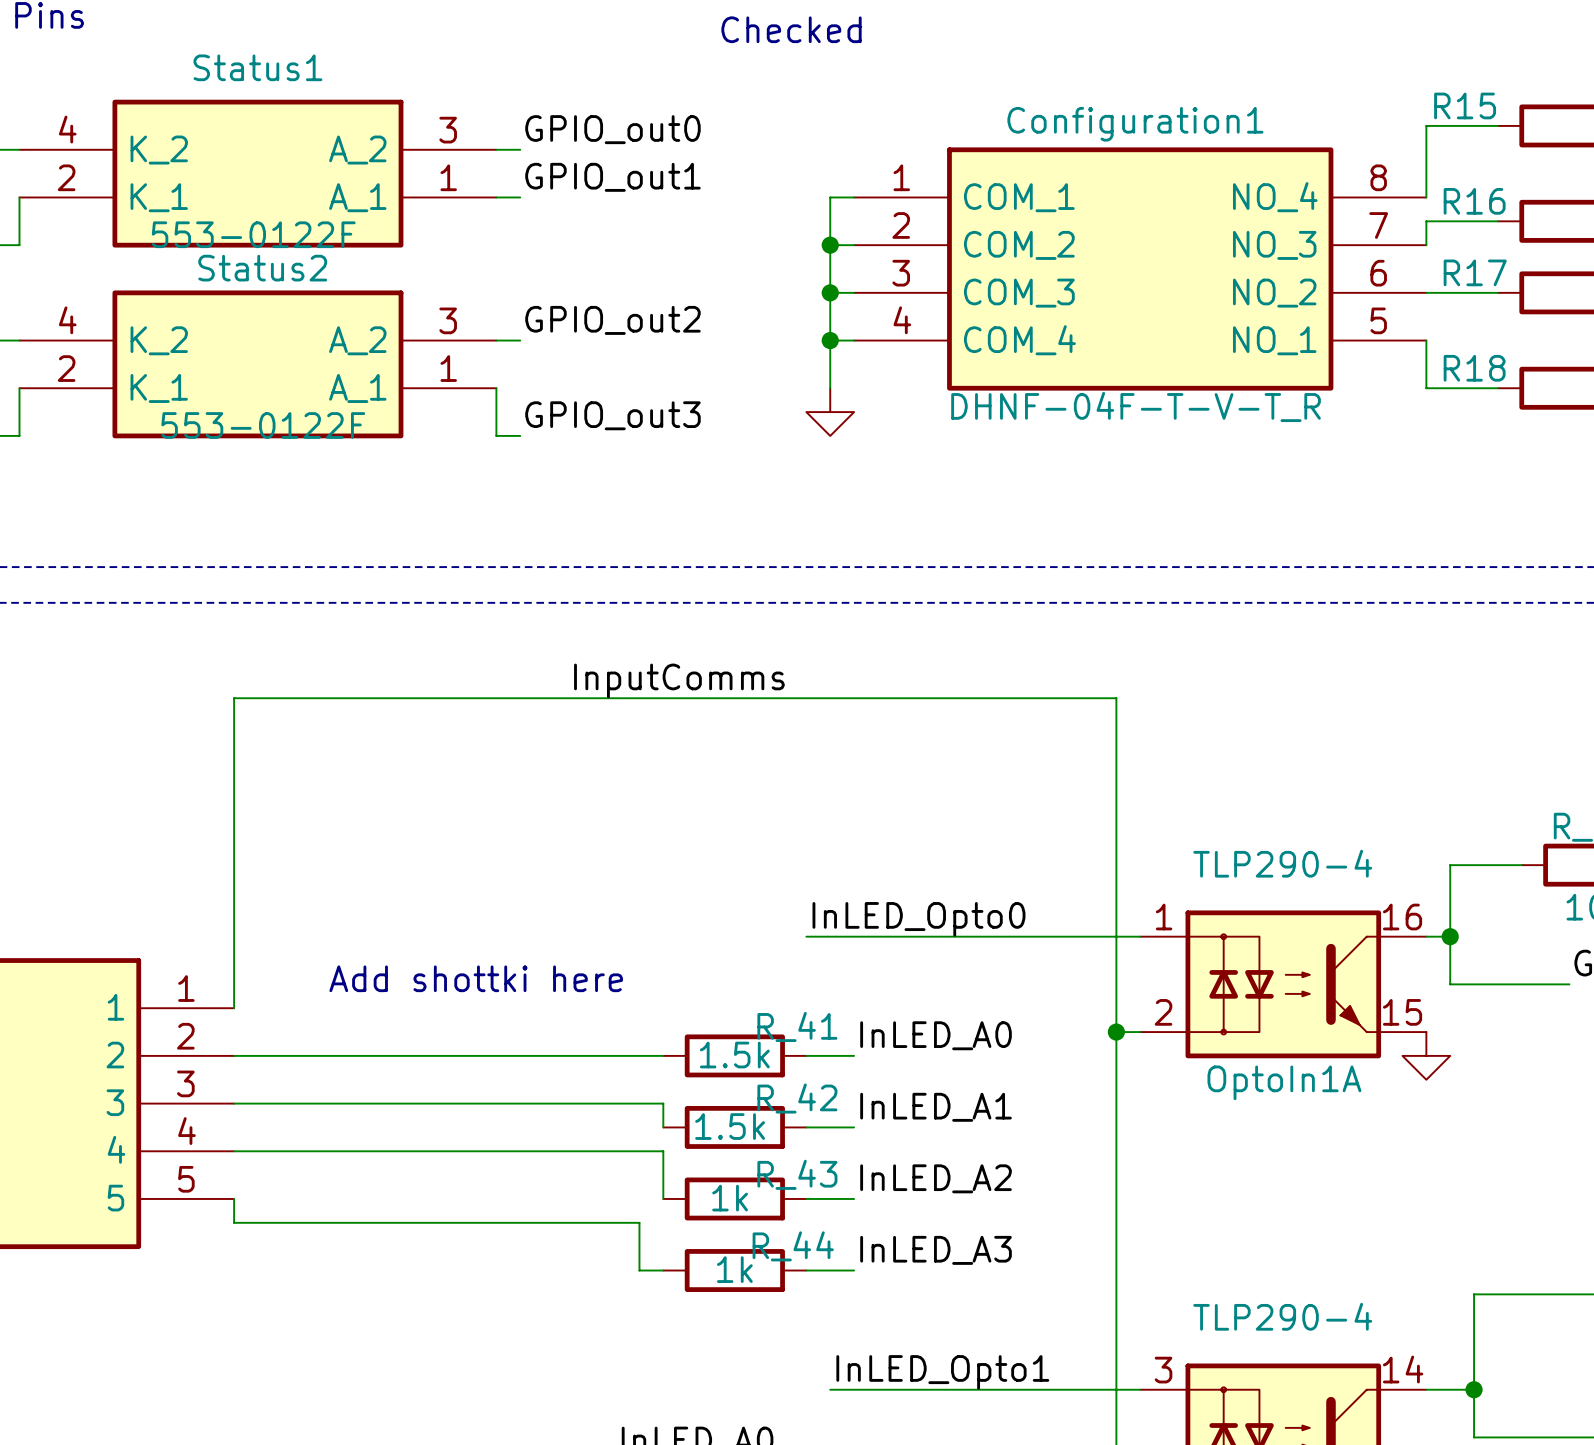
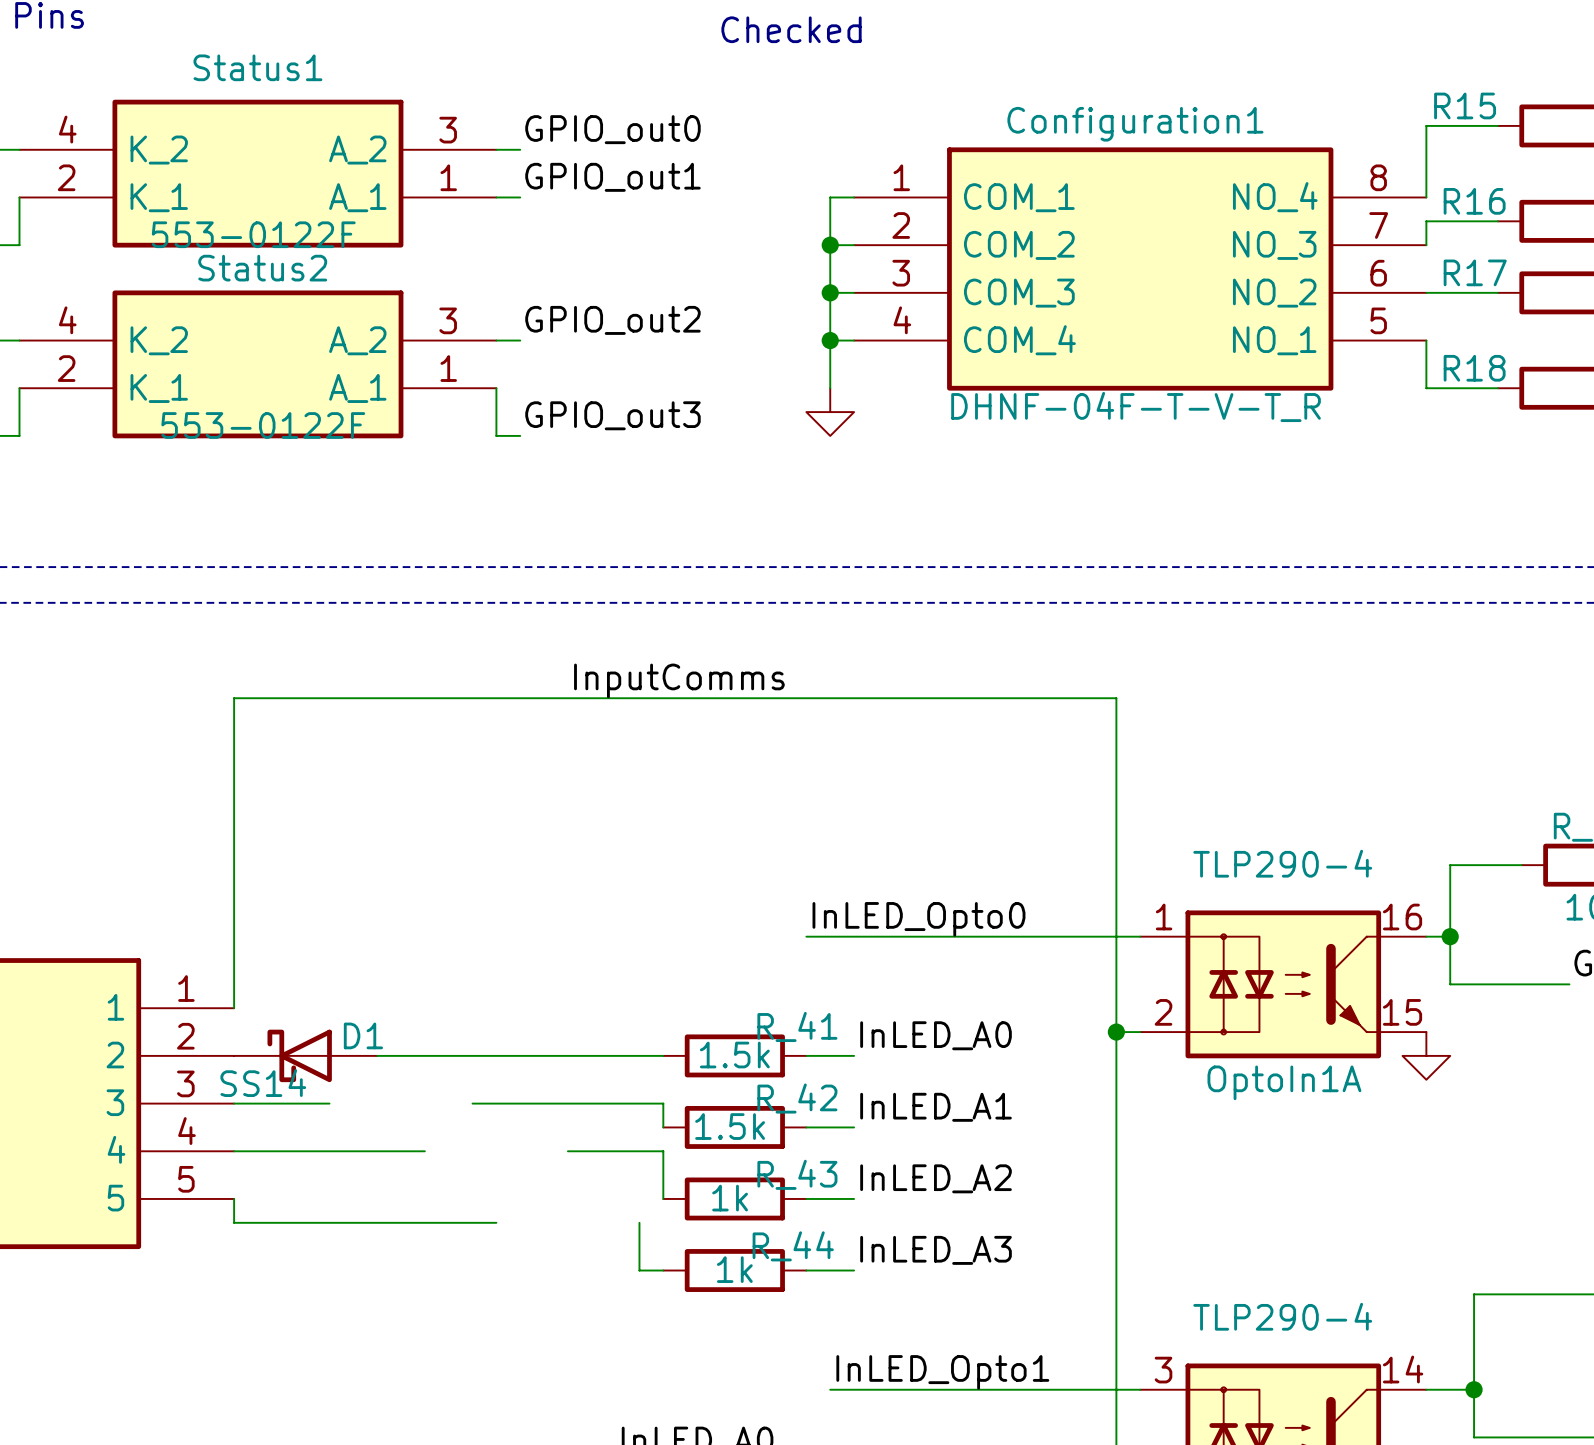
text: Add shottki here (476, 978) -> none
D1: none -> SS14 (305, 1055)
wire: (329, 1103) (472, 1103) -> none
wire: (424, 1151) (567, 1151) -> none
wire: (496, 1222) (639, 1222) -> none

